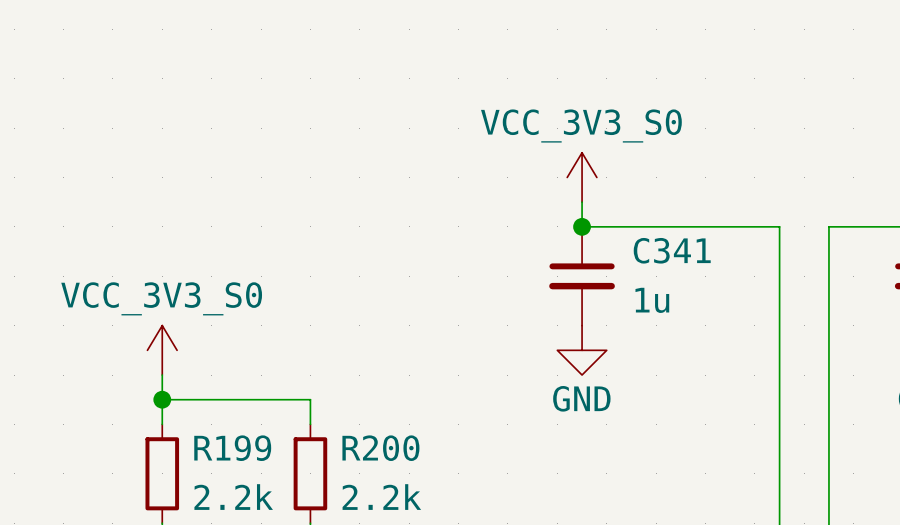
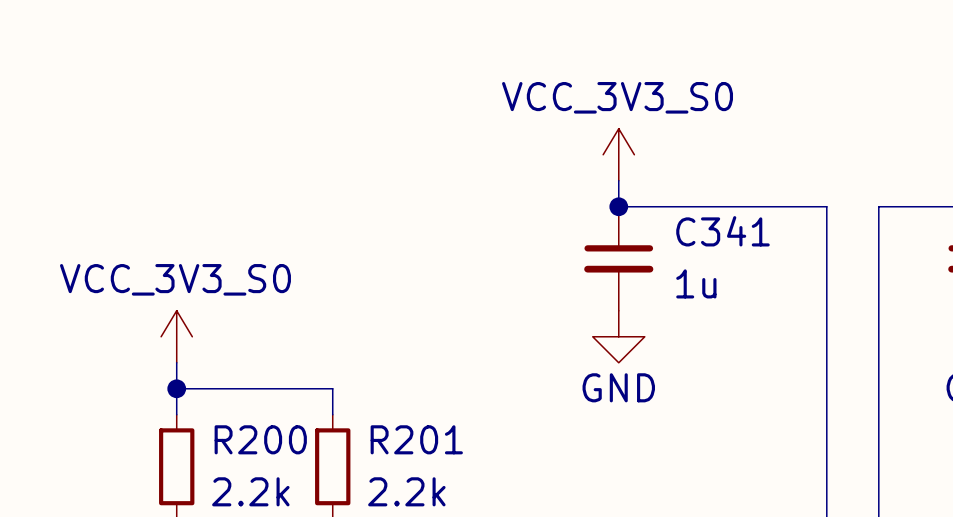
R199 name: R199 (232, 448) -> R200 (260, 439)
R200 name: R200 (380, 448) -> R201 (416, 439)

